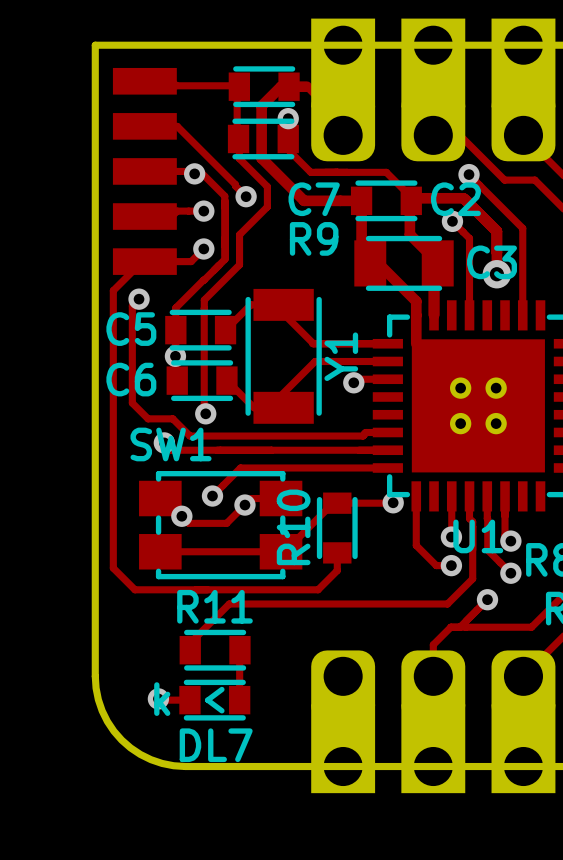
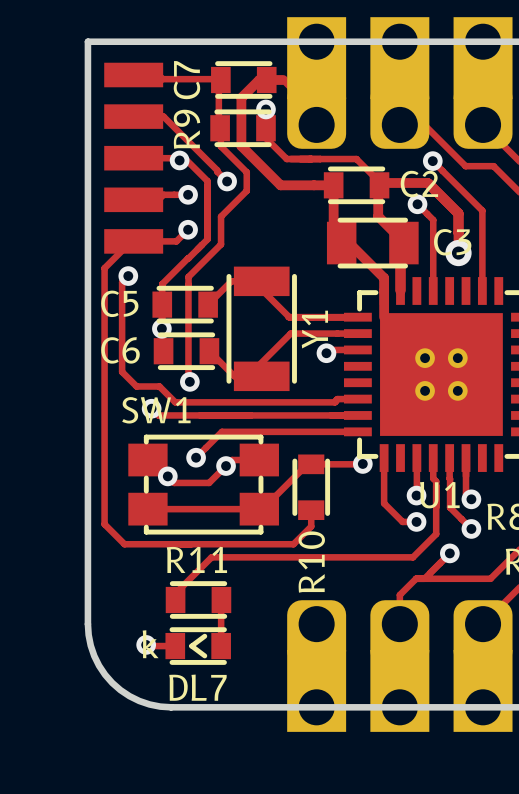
C7 name rotation: 0° (314, 199) -> 90° counterclockwise (186, 80)
C7 name position: C7 (314, 199) -> C7 (186, 80)
R9 name rotation: 0° (314, 238) -> 90° counterclockwise (186, 129)
R9 name position: R9 (314, 238) -> R9 (186, 129)
R10 name position: R10 (293, 527) -> R10 (311, 562)

